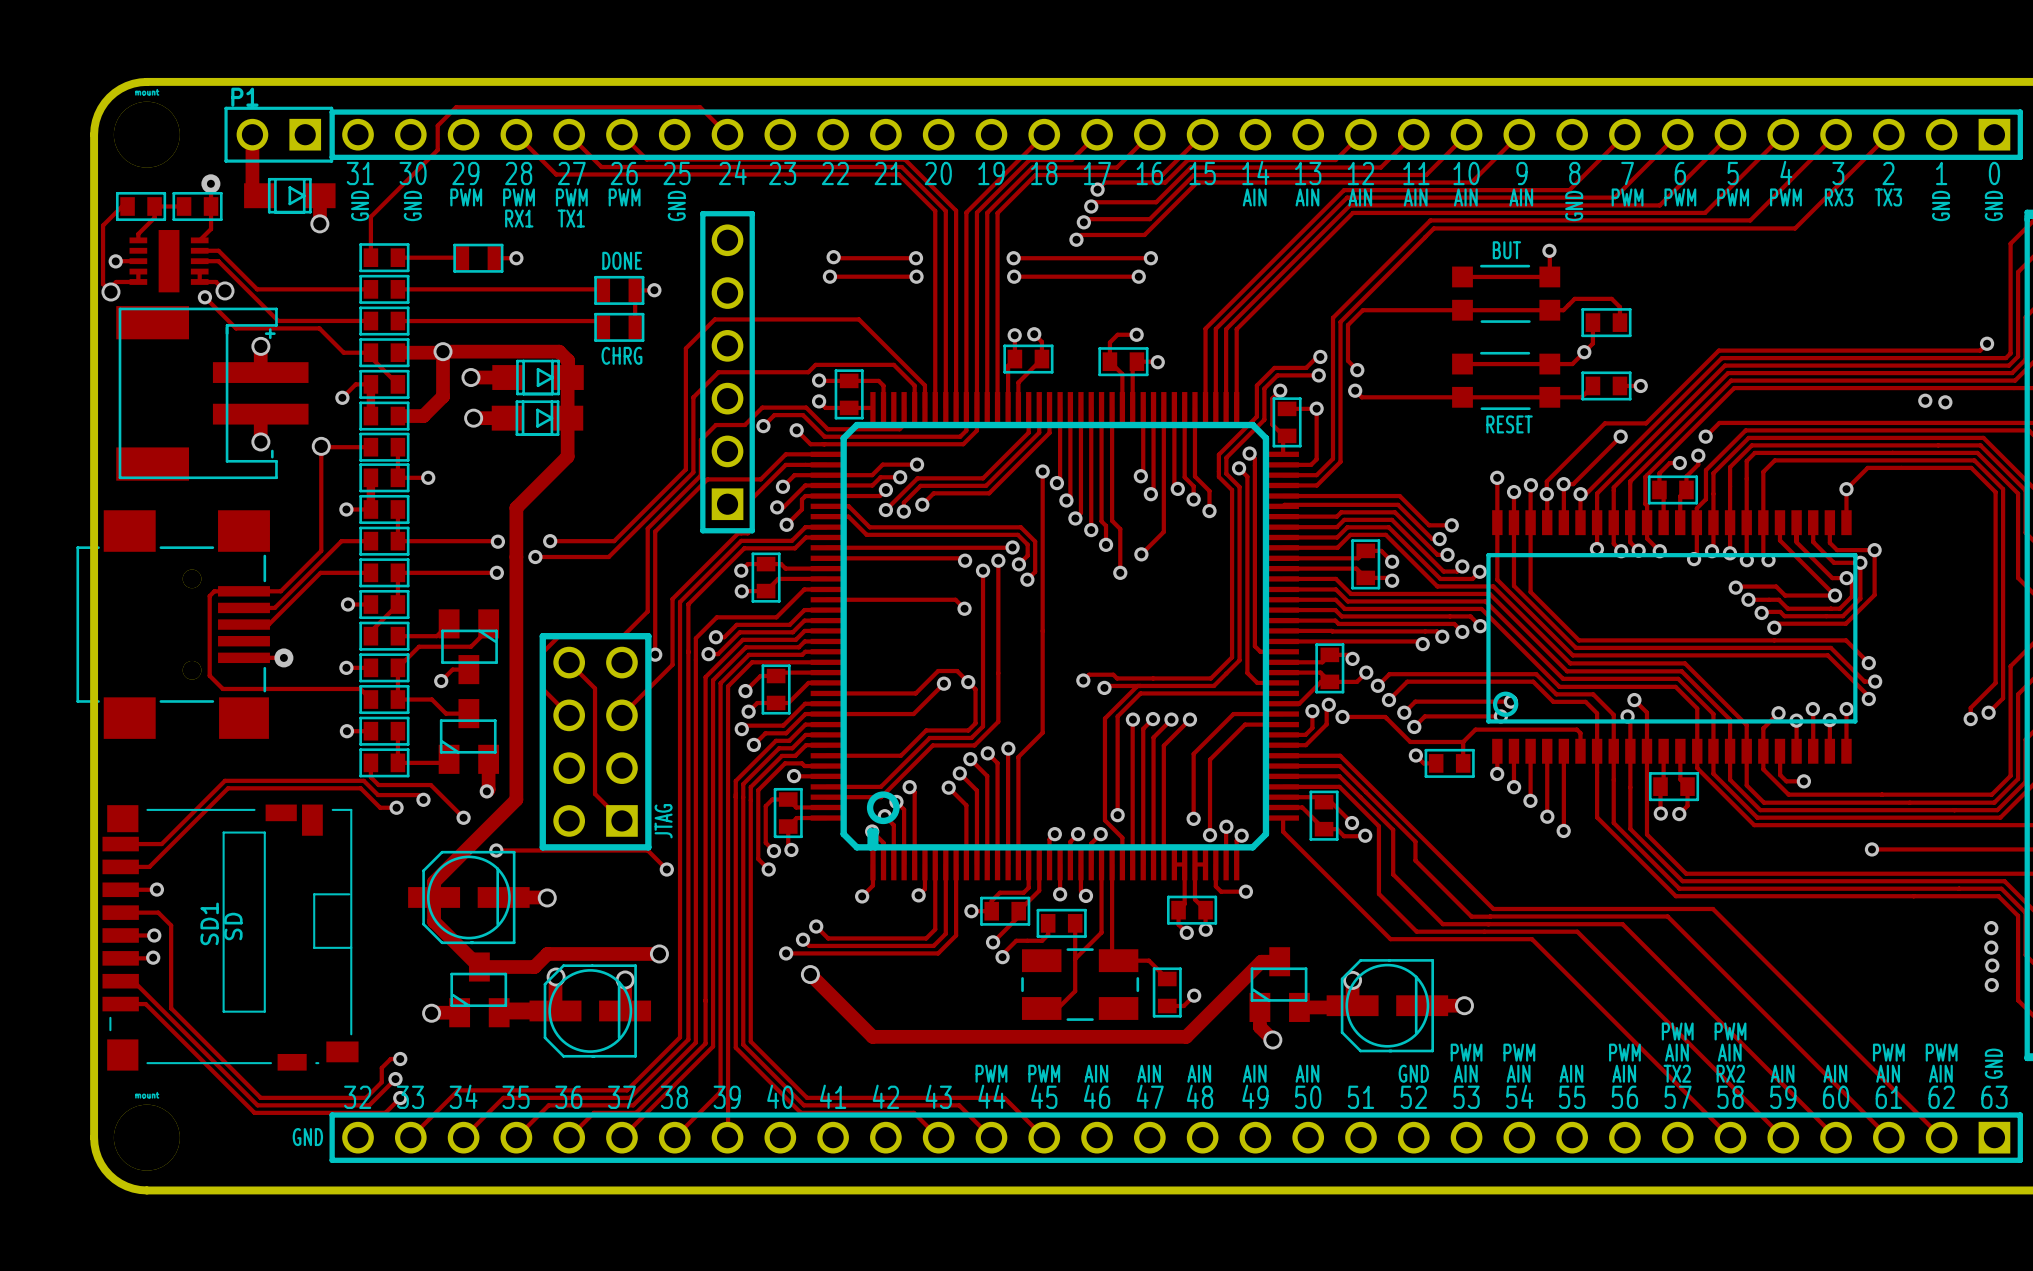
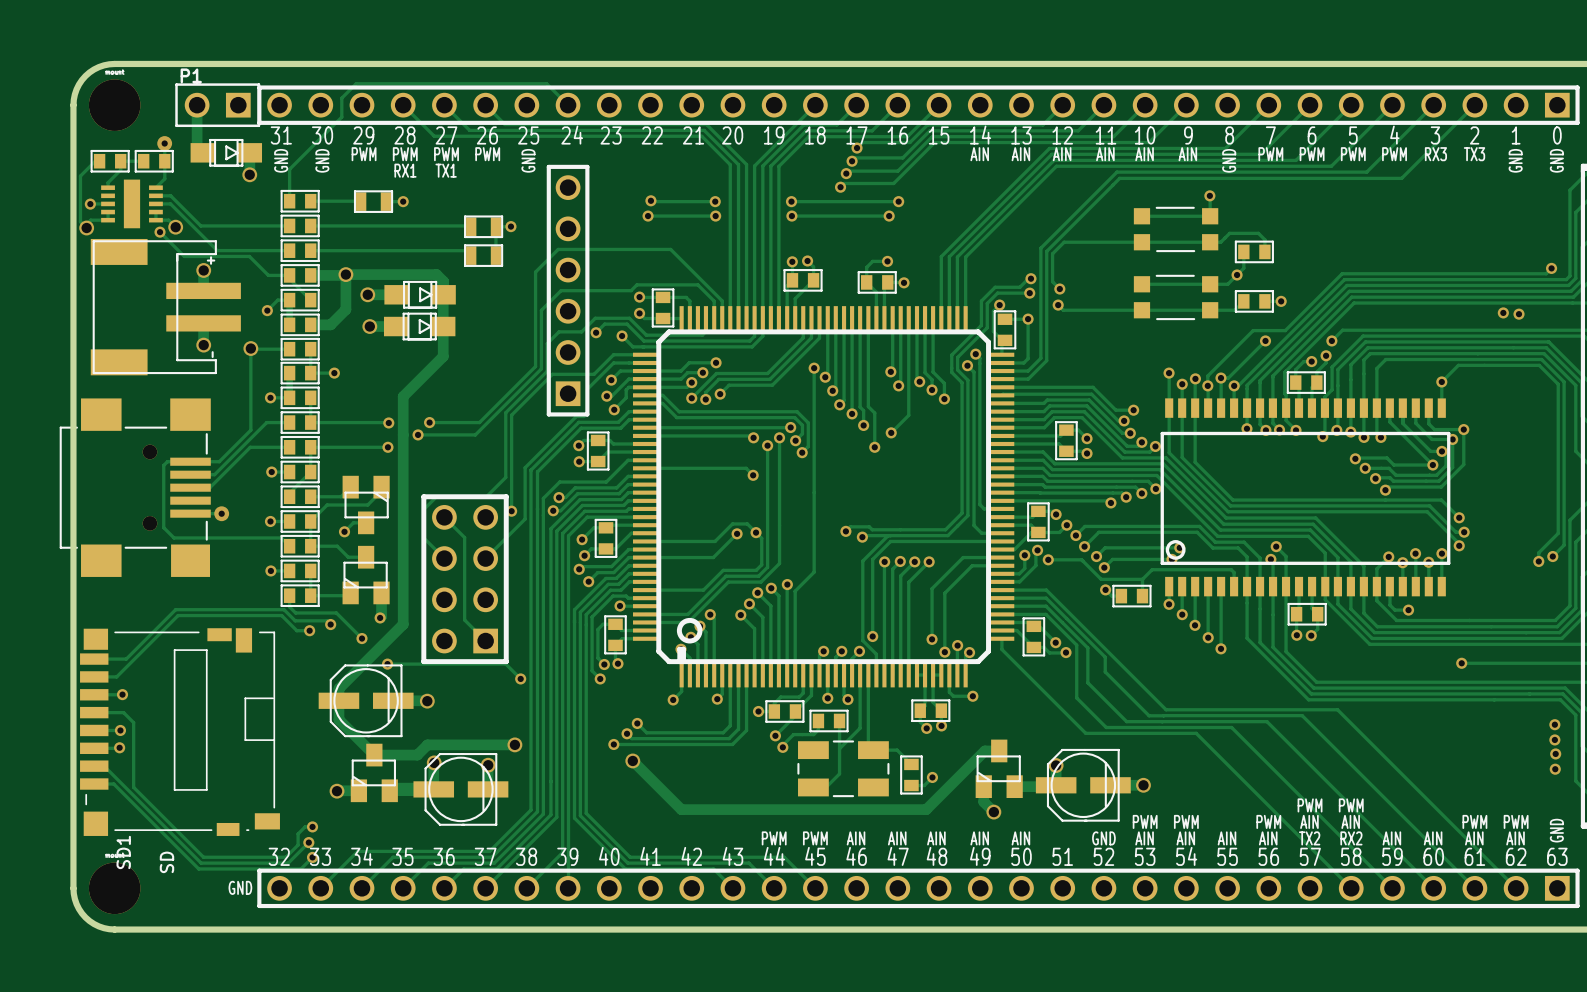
text: BUT (1506, 250) -> none
text: DONE (622, 260) -> none
text: CHRG (621, 355) -> none
text: RESET (1509, 424) -> none
text: JTAG (663, 821) -> none
SD1 name position: SD1 (209, 923) -> SD1 (123, 852)
SD1 value position: SD (233, 926) -> SD (166, 862)

